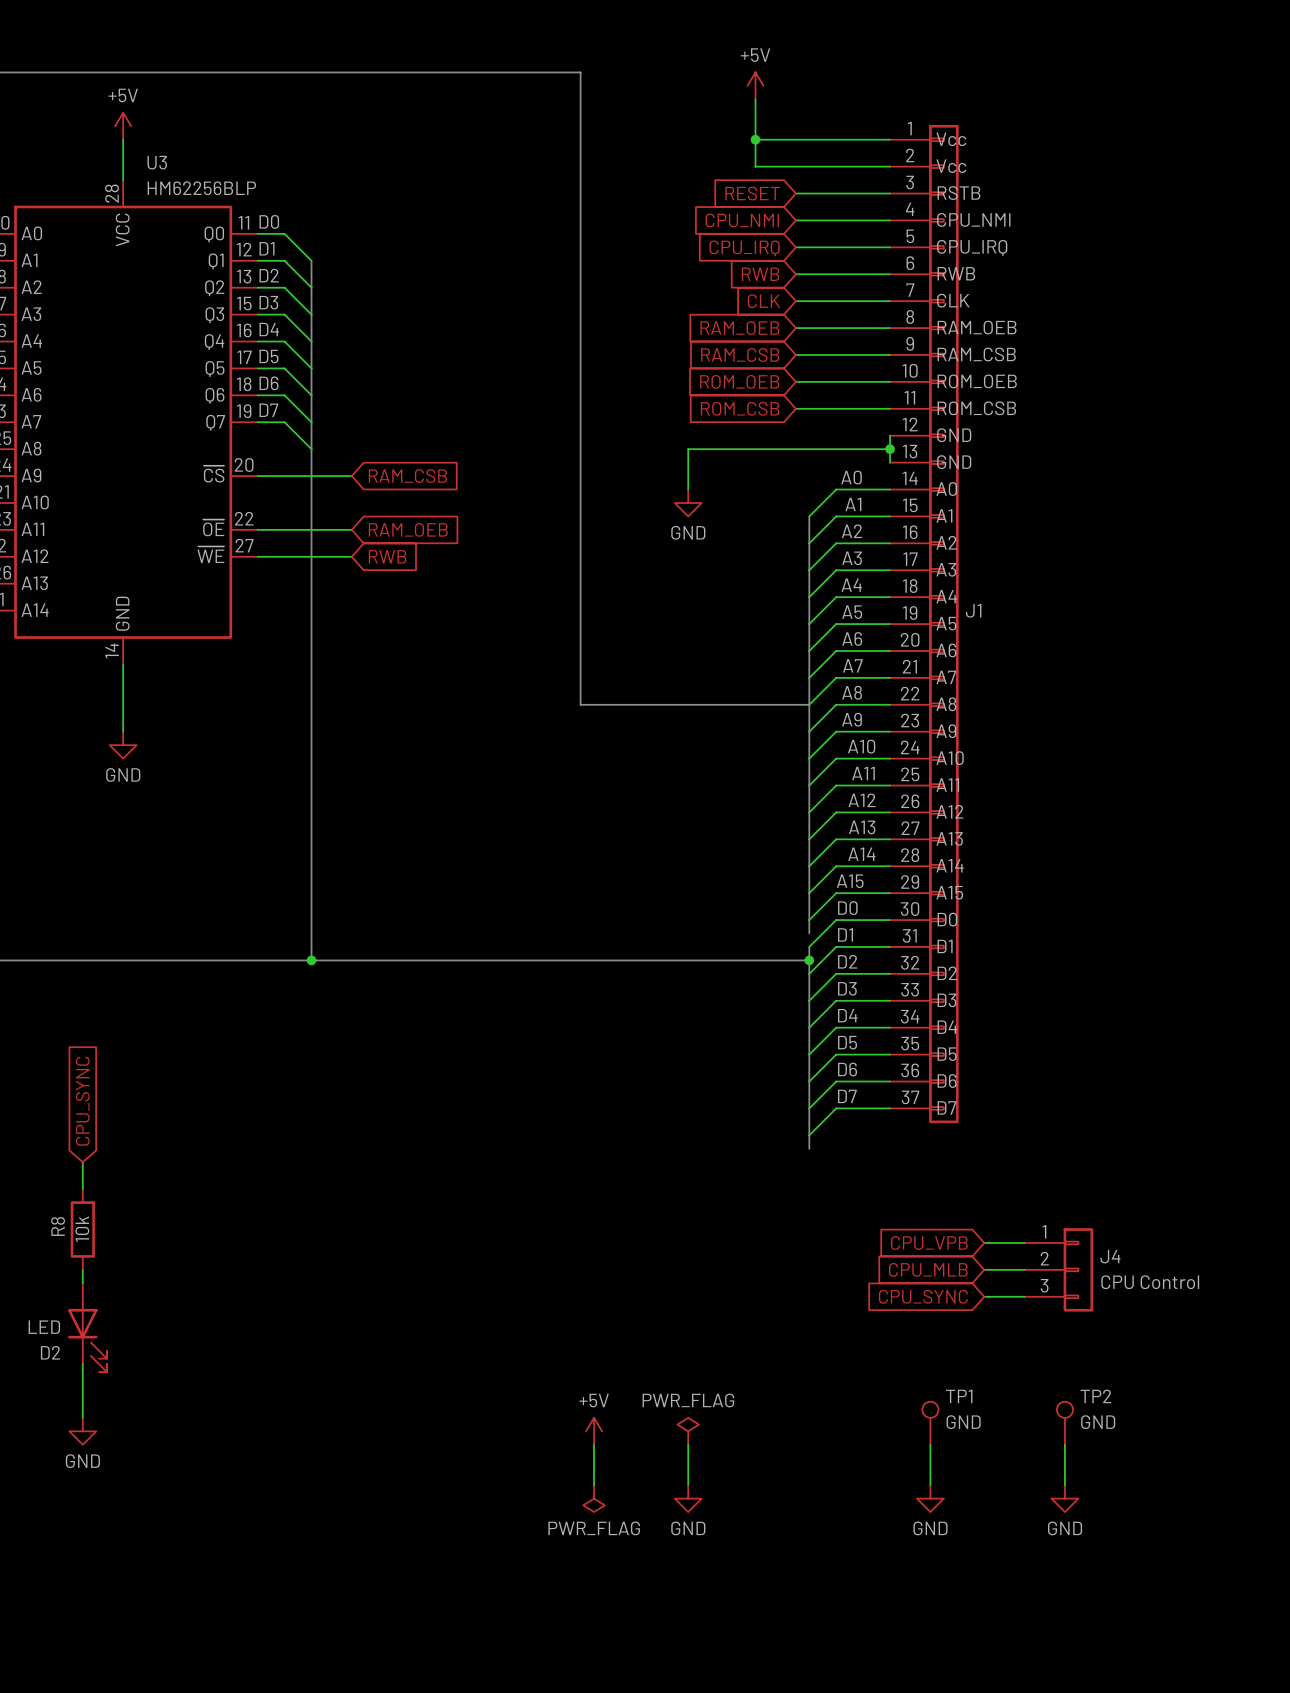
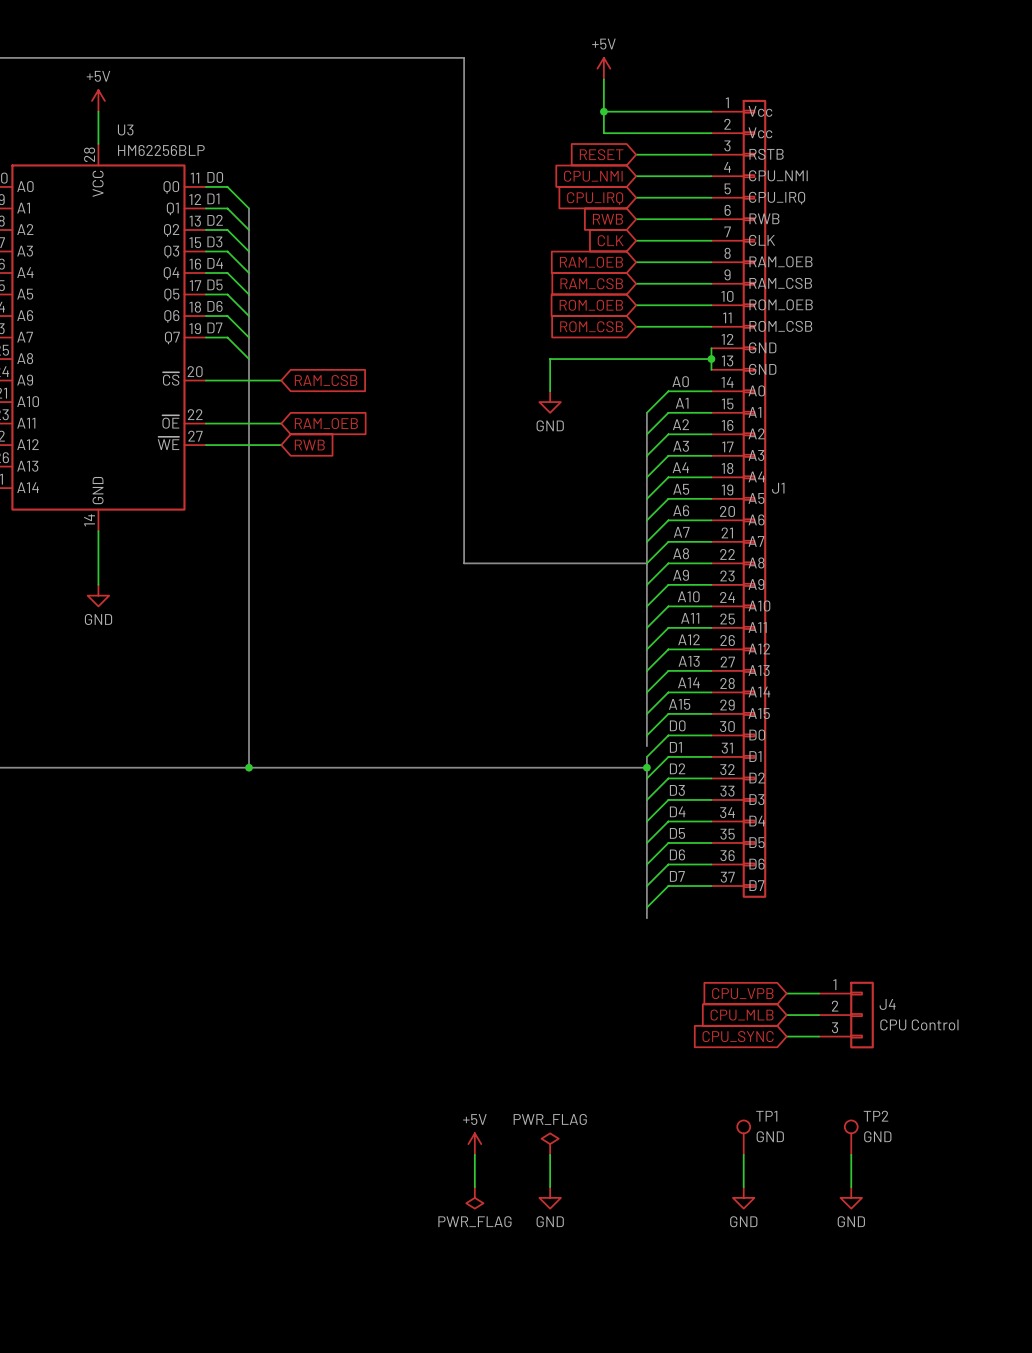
global label: CPU_SYNC (82, 1101) -> none
wire: (82, 1162) (82, 1189) -> none
R8: 10k (82, 1229) -> none
wire: (82, 1269) (82, 1283) -> none
D2: LED (87, 1327) -> none
wire: (82, 1364) (82, 1417) -> none
power symbol: GND (82, 1431) -> none

